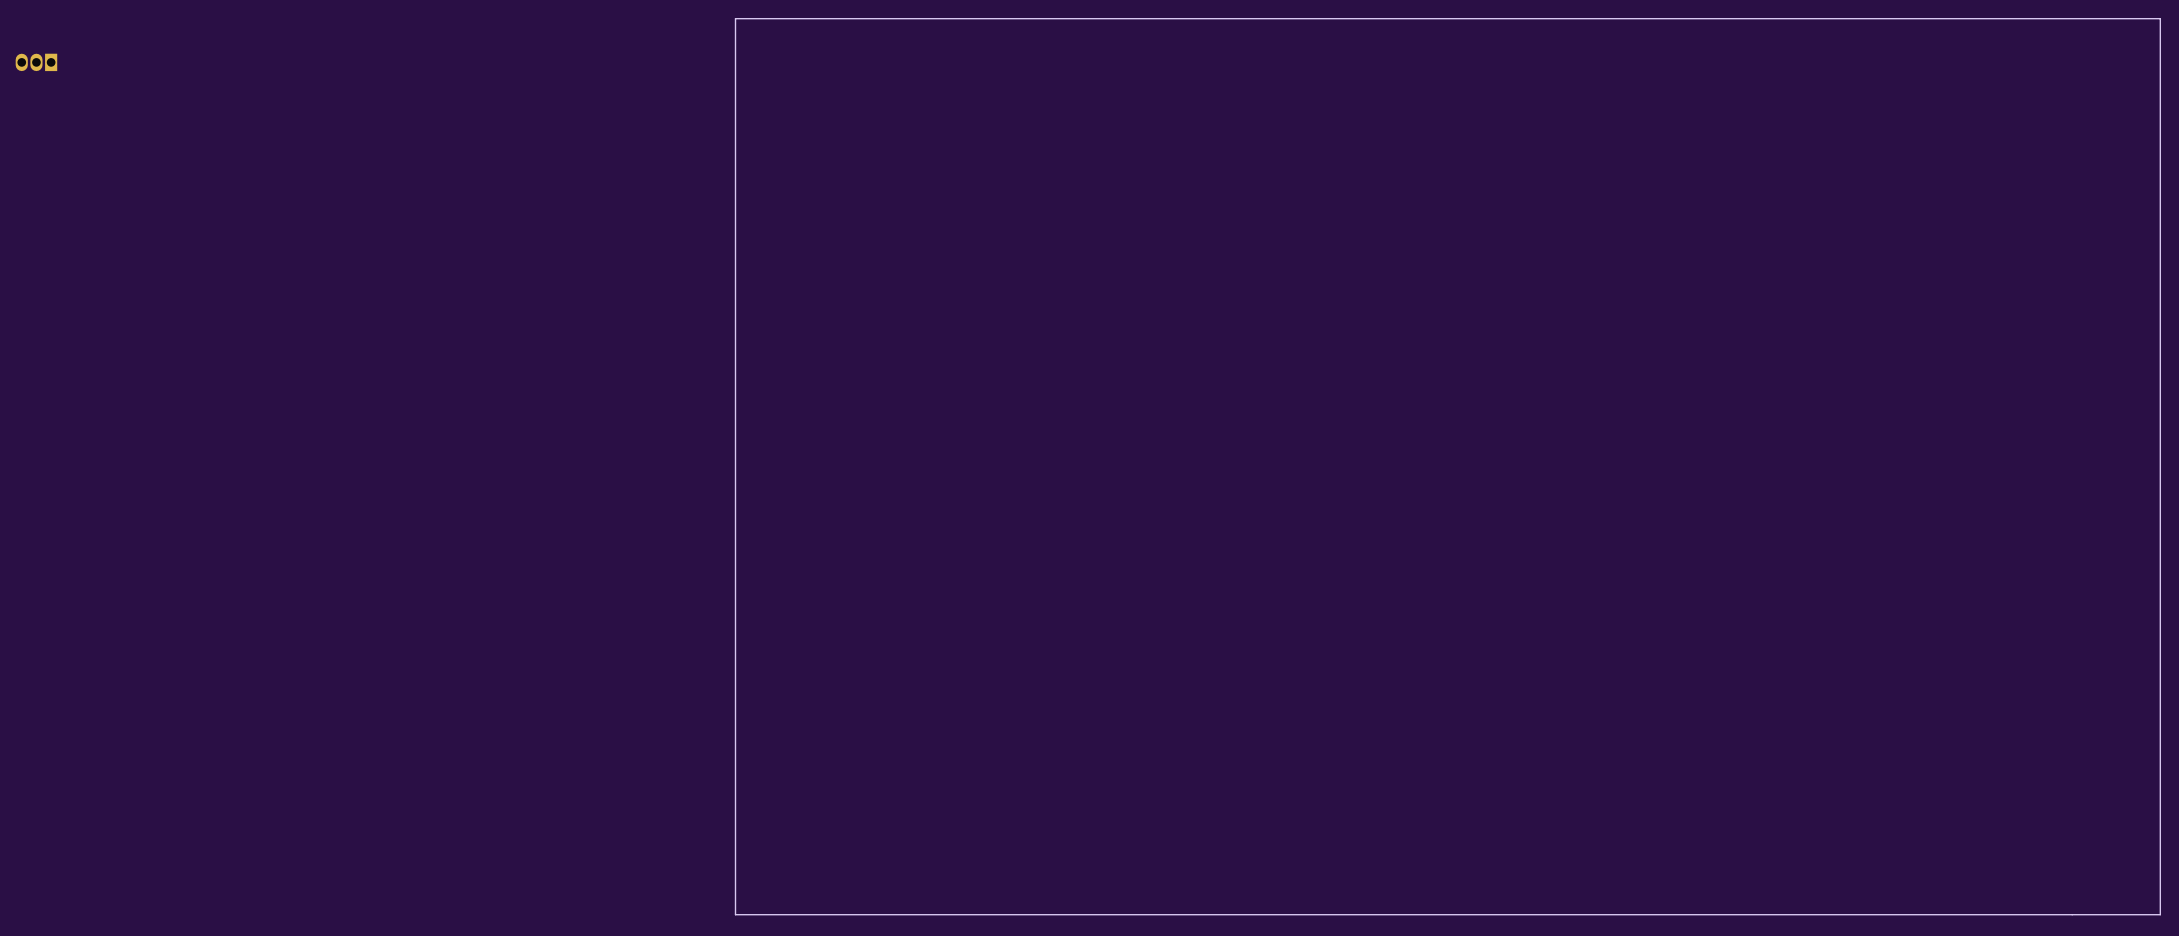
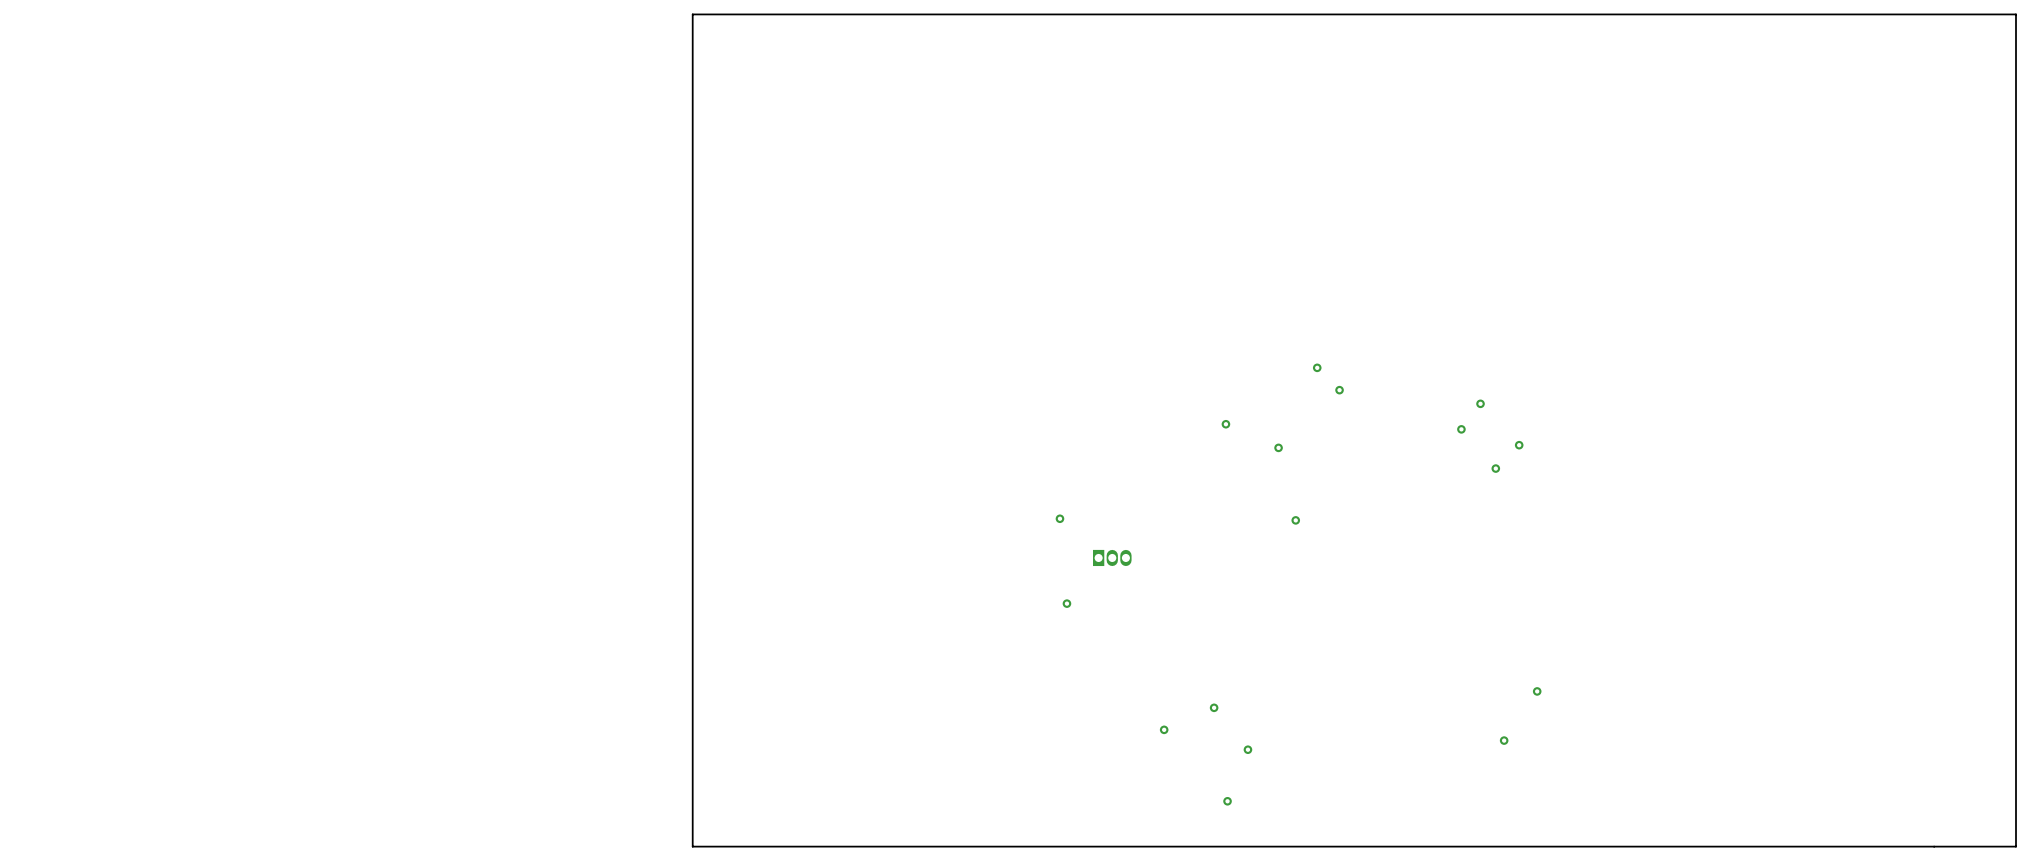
part: (36, 62) -> none
via: none -> (1317, 367)
via: none -> (1339, 390)
via: none -> (1480, 403)
via: none -> (1225, 424)
via: none -> (1461, 429)
via: none -> (1519, 445)
via: none -> (1278, 447)
via: none -> (1495, 468)
via: none -> (1059, 518)
via: none -> (1295, 520)
part: none -> (1112, 557)
via: none -> (1066, 603)
via: none -> (1537, 691)
via: none -> (1214, 707)
via: none -> (1164, 729)
via: none -> (1504, 740)
via: none -> (1247, 749)
via: none -> (1227, 801)

